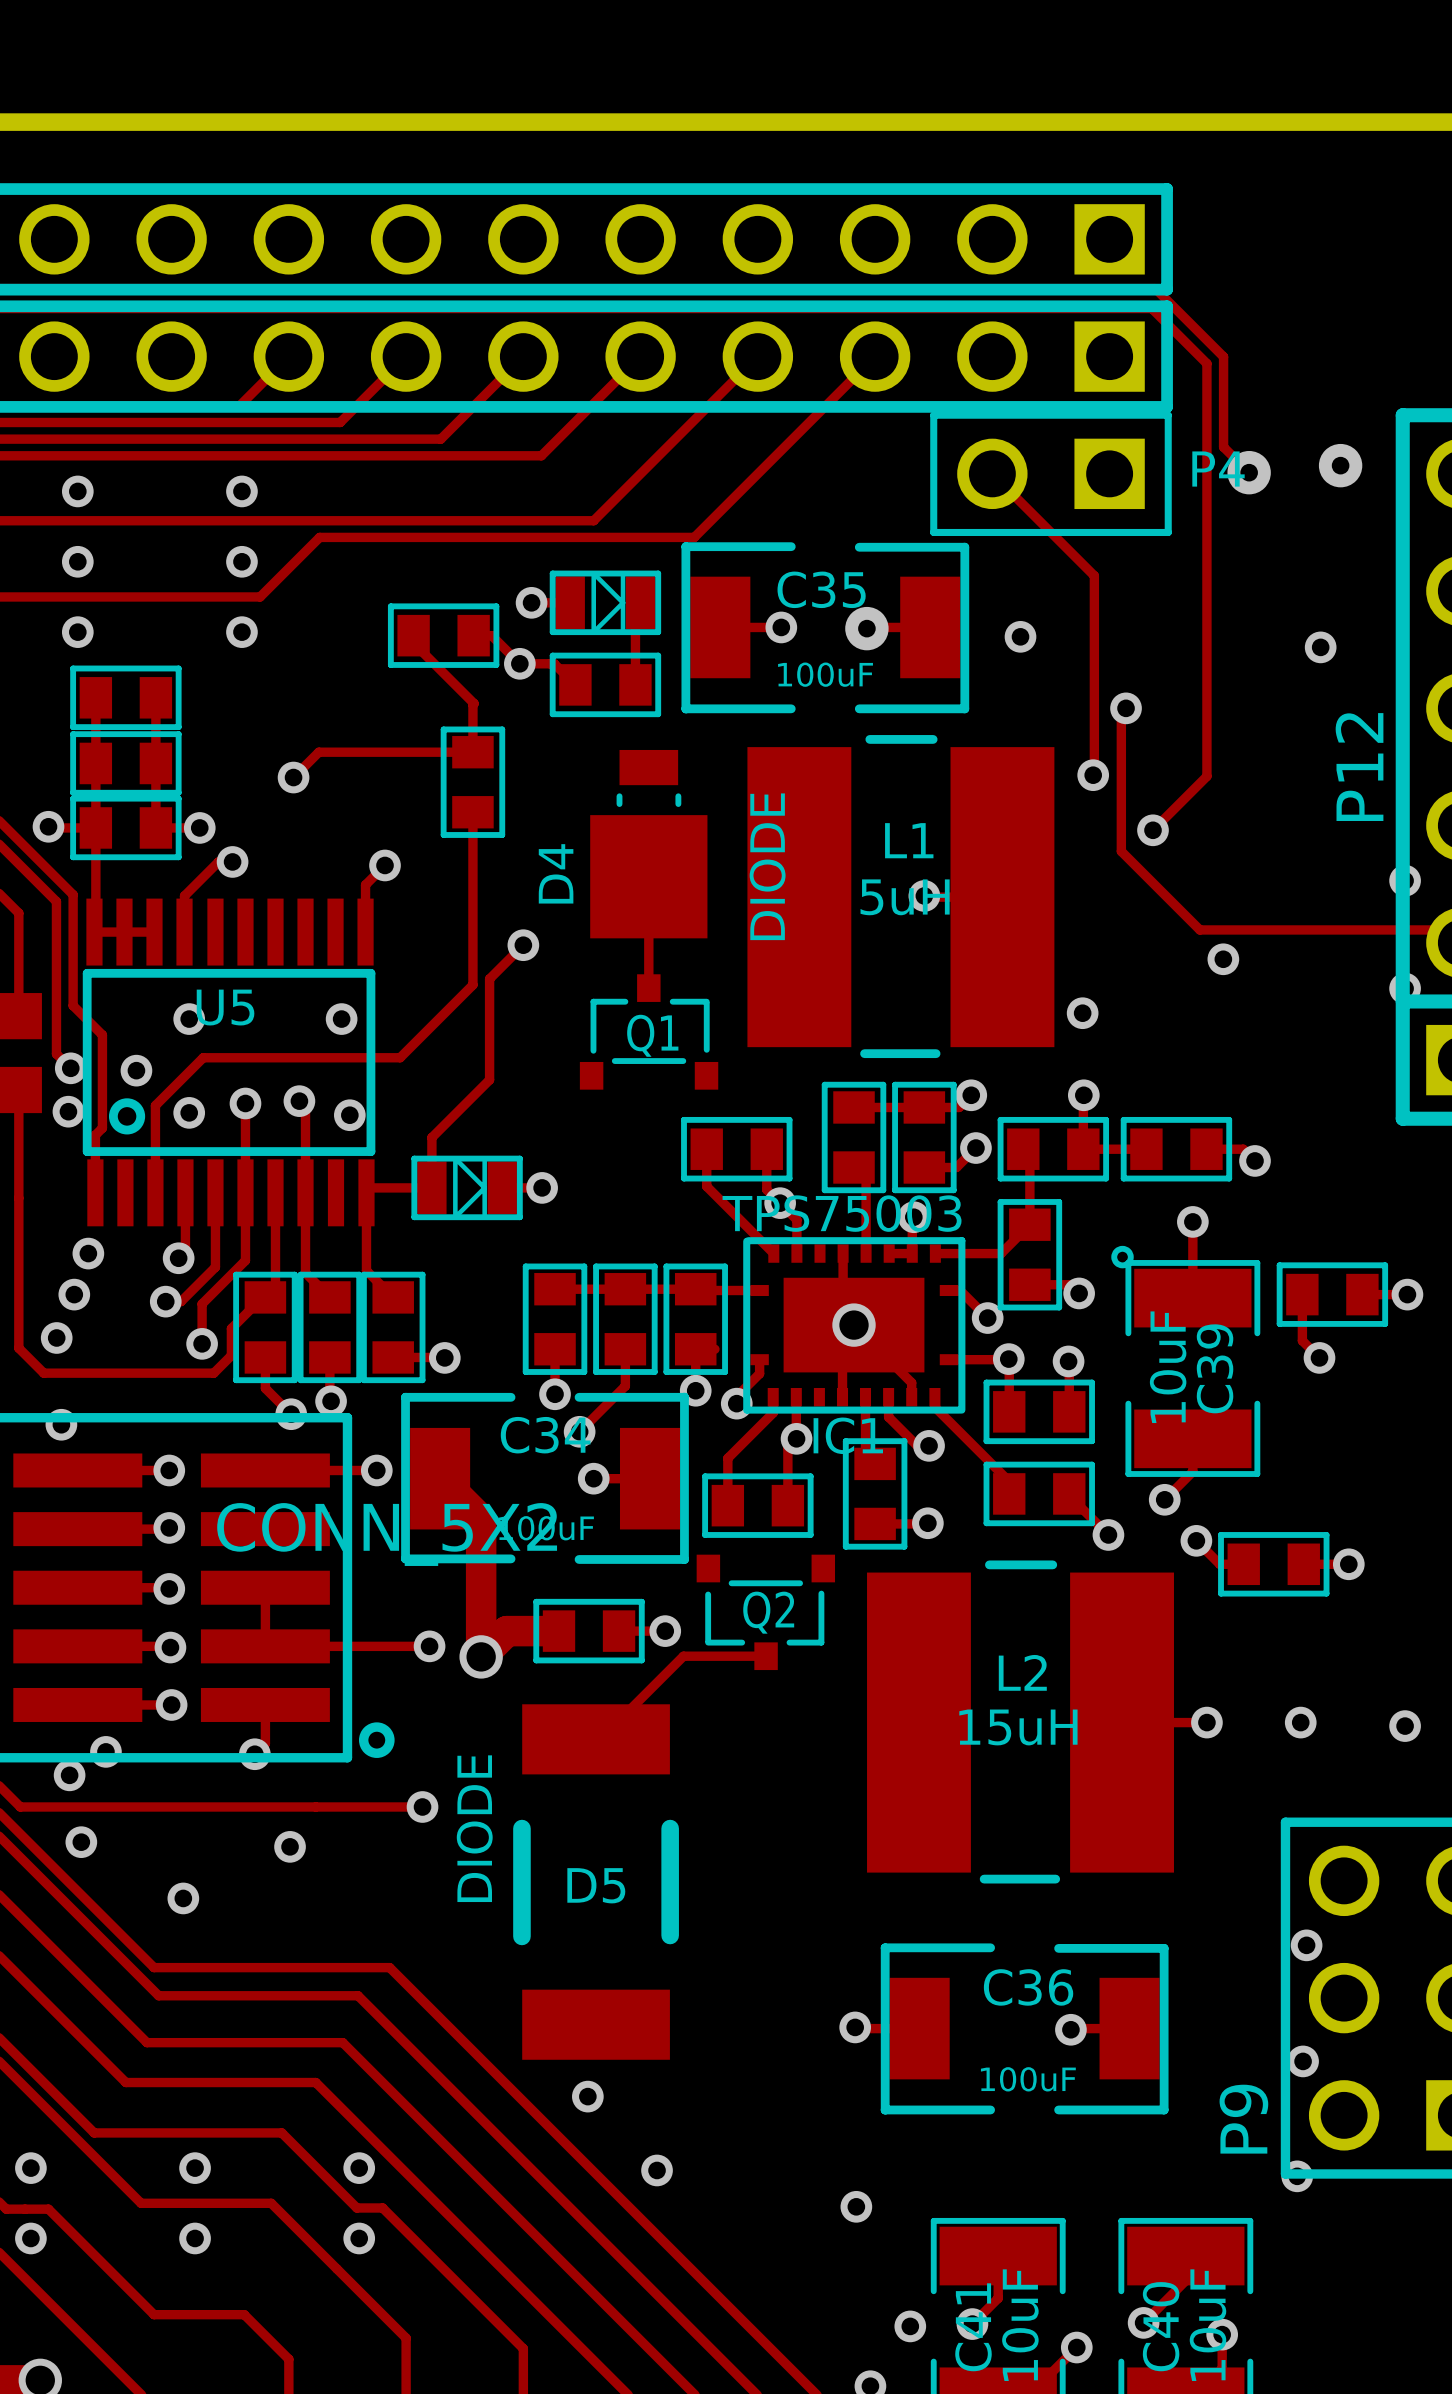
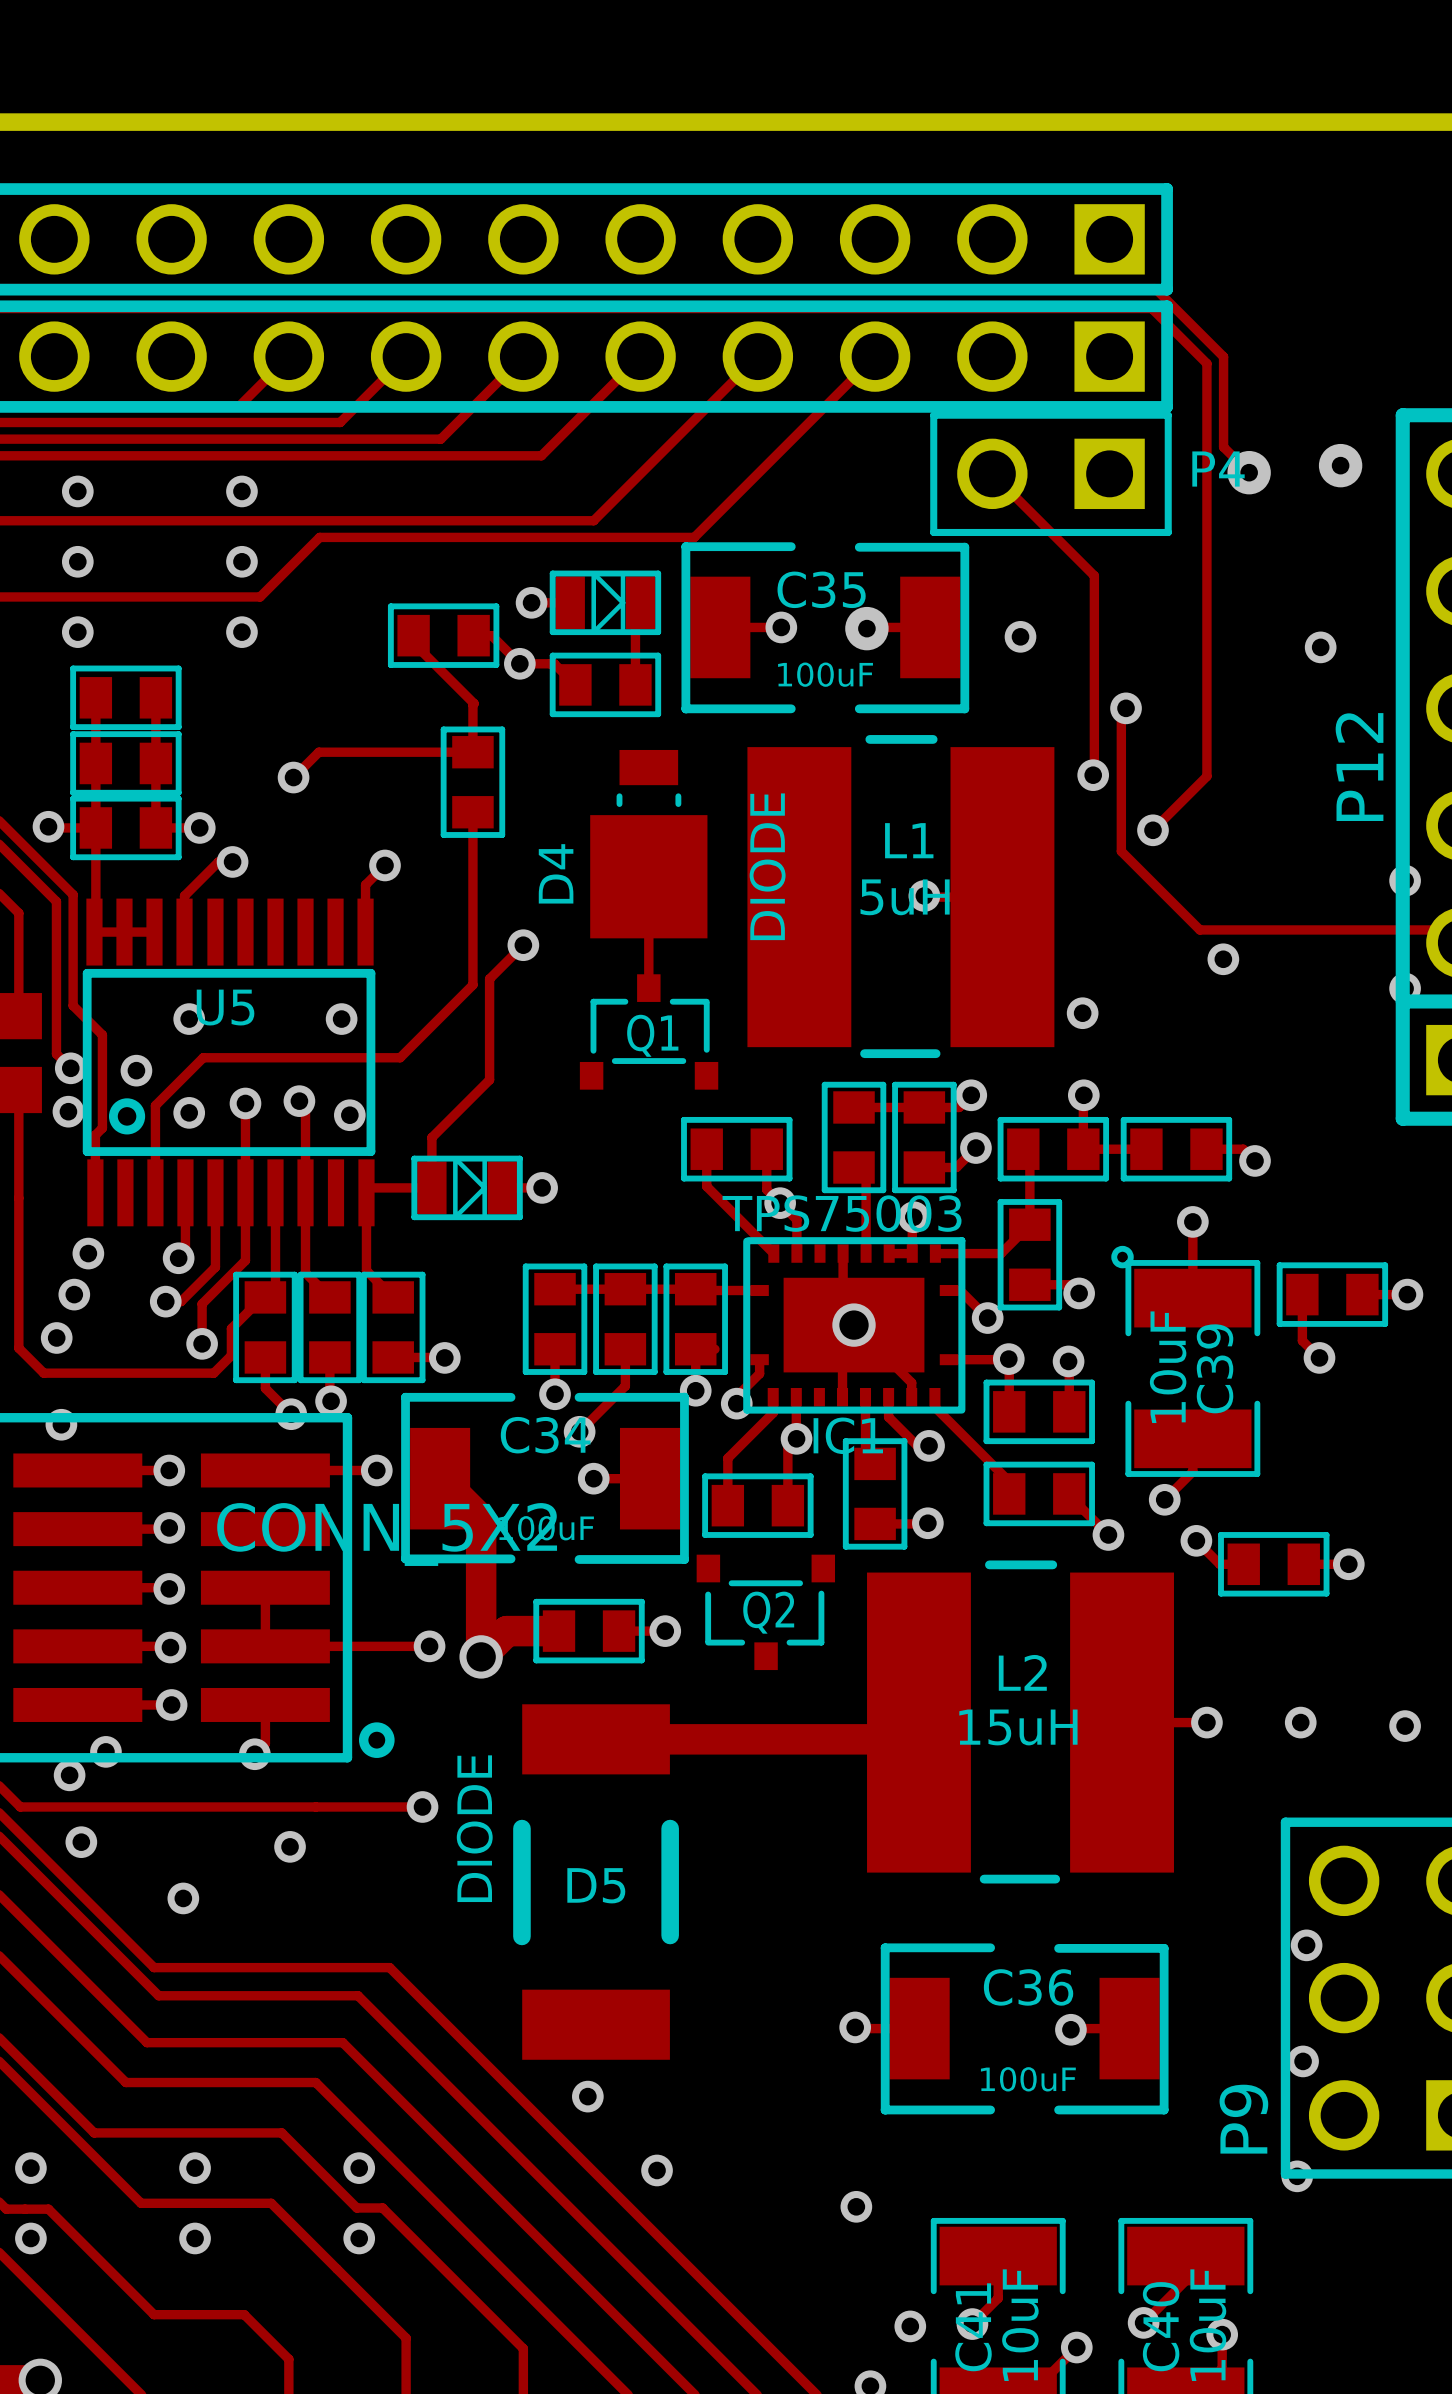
track: (766, 1656) (683, 1656) (600, 1739) -> (918, 1722) (902, 1739) (600, 1739)

